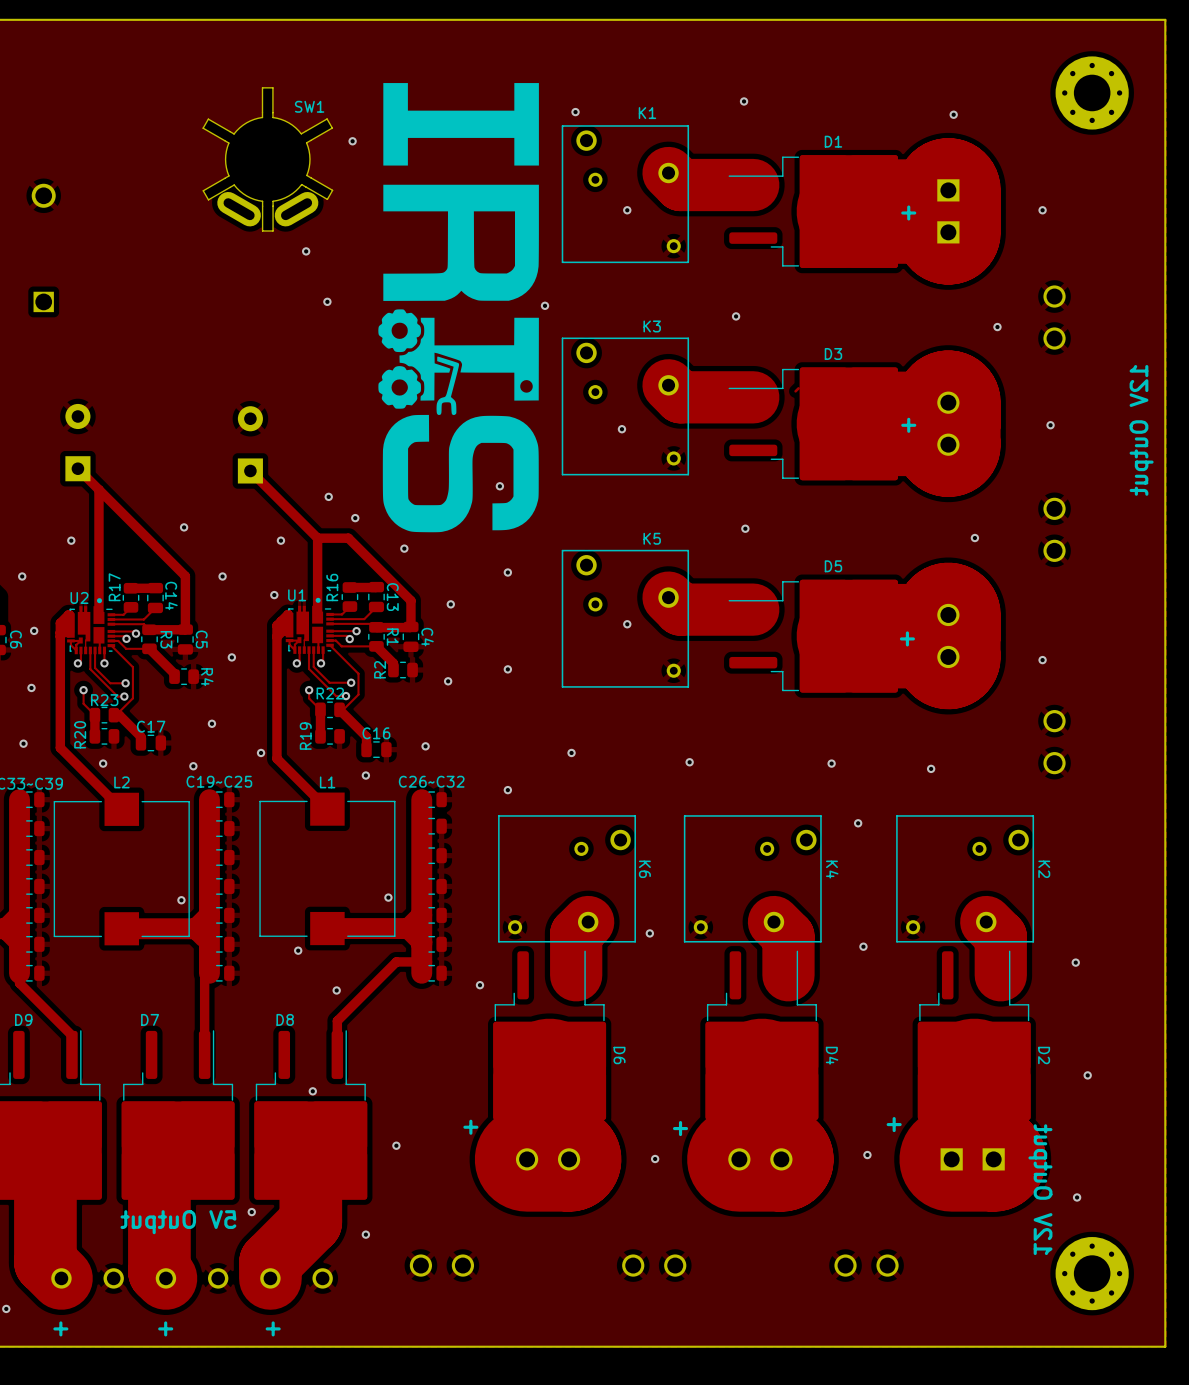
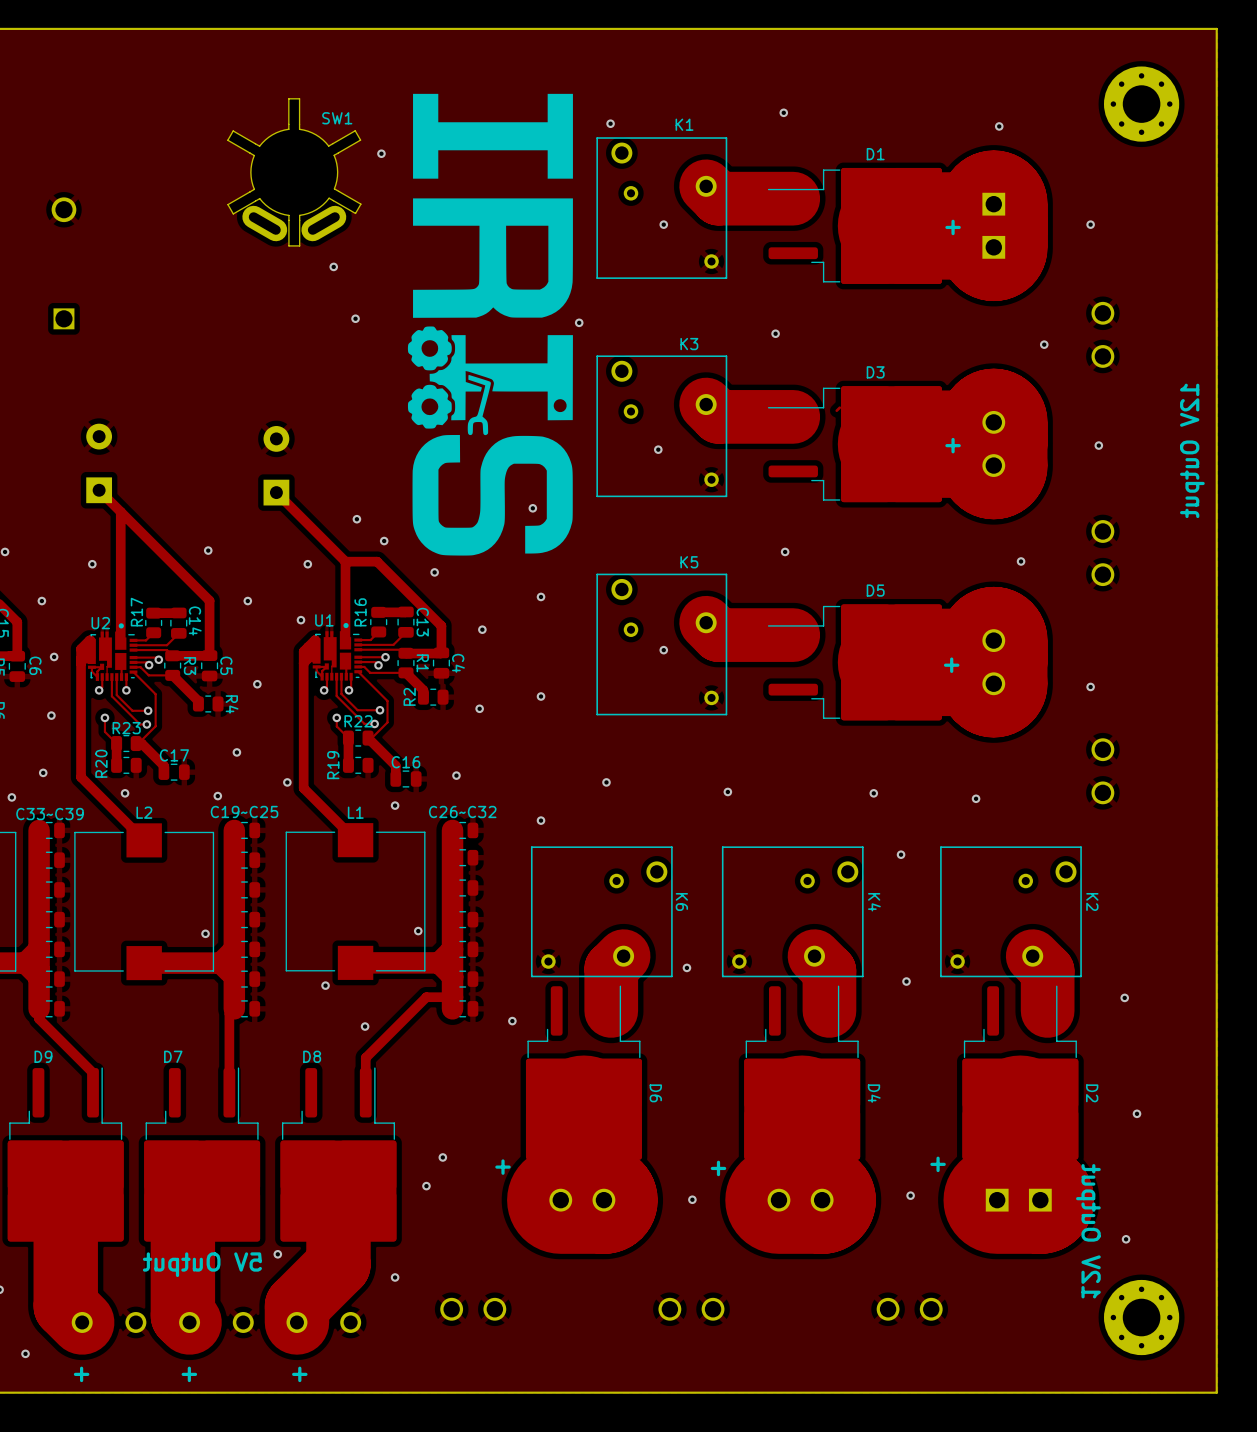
via: (312, 1091) -> none
via: none -> (442, 1157)

